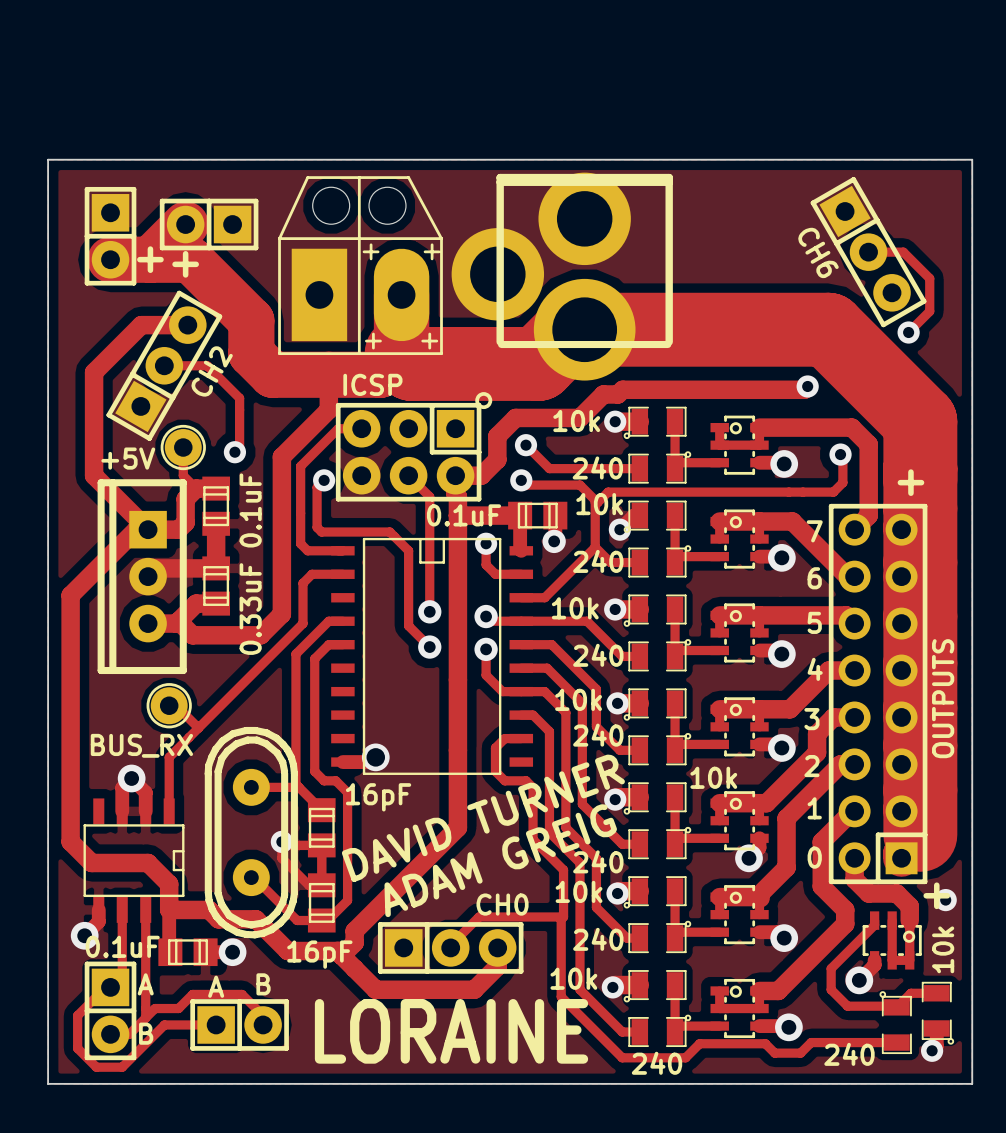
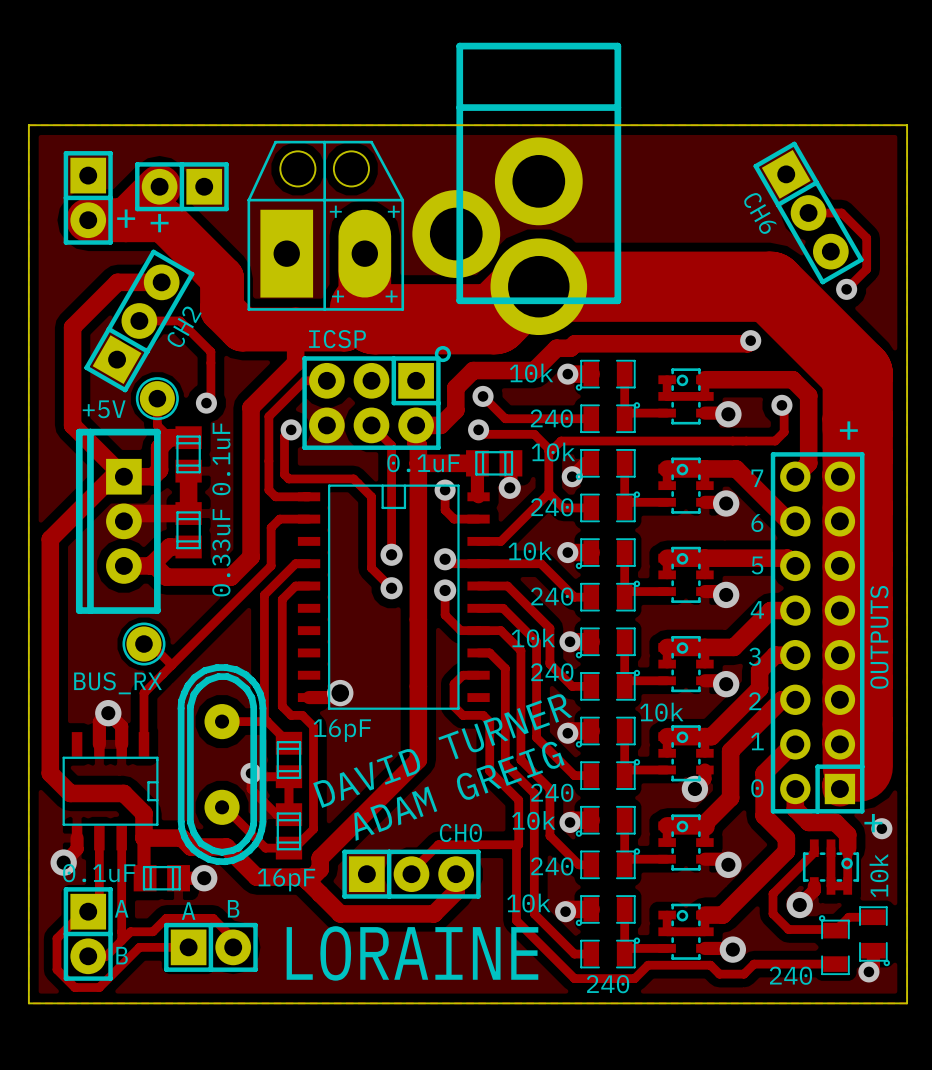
part: none -> (516, 188)
part: (562, 276) -> none

